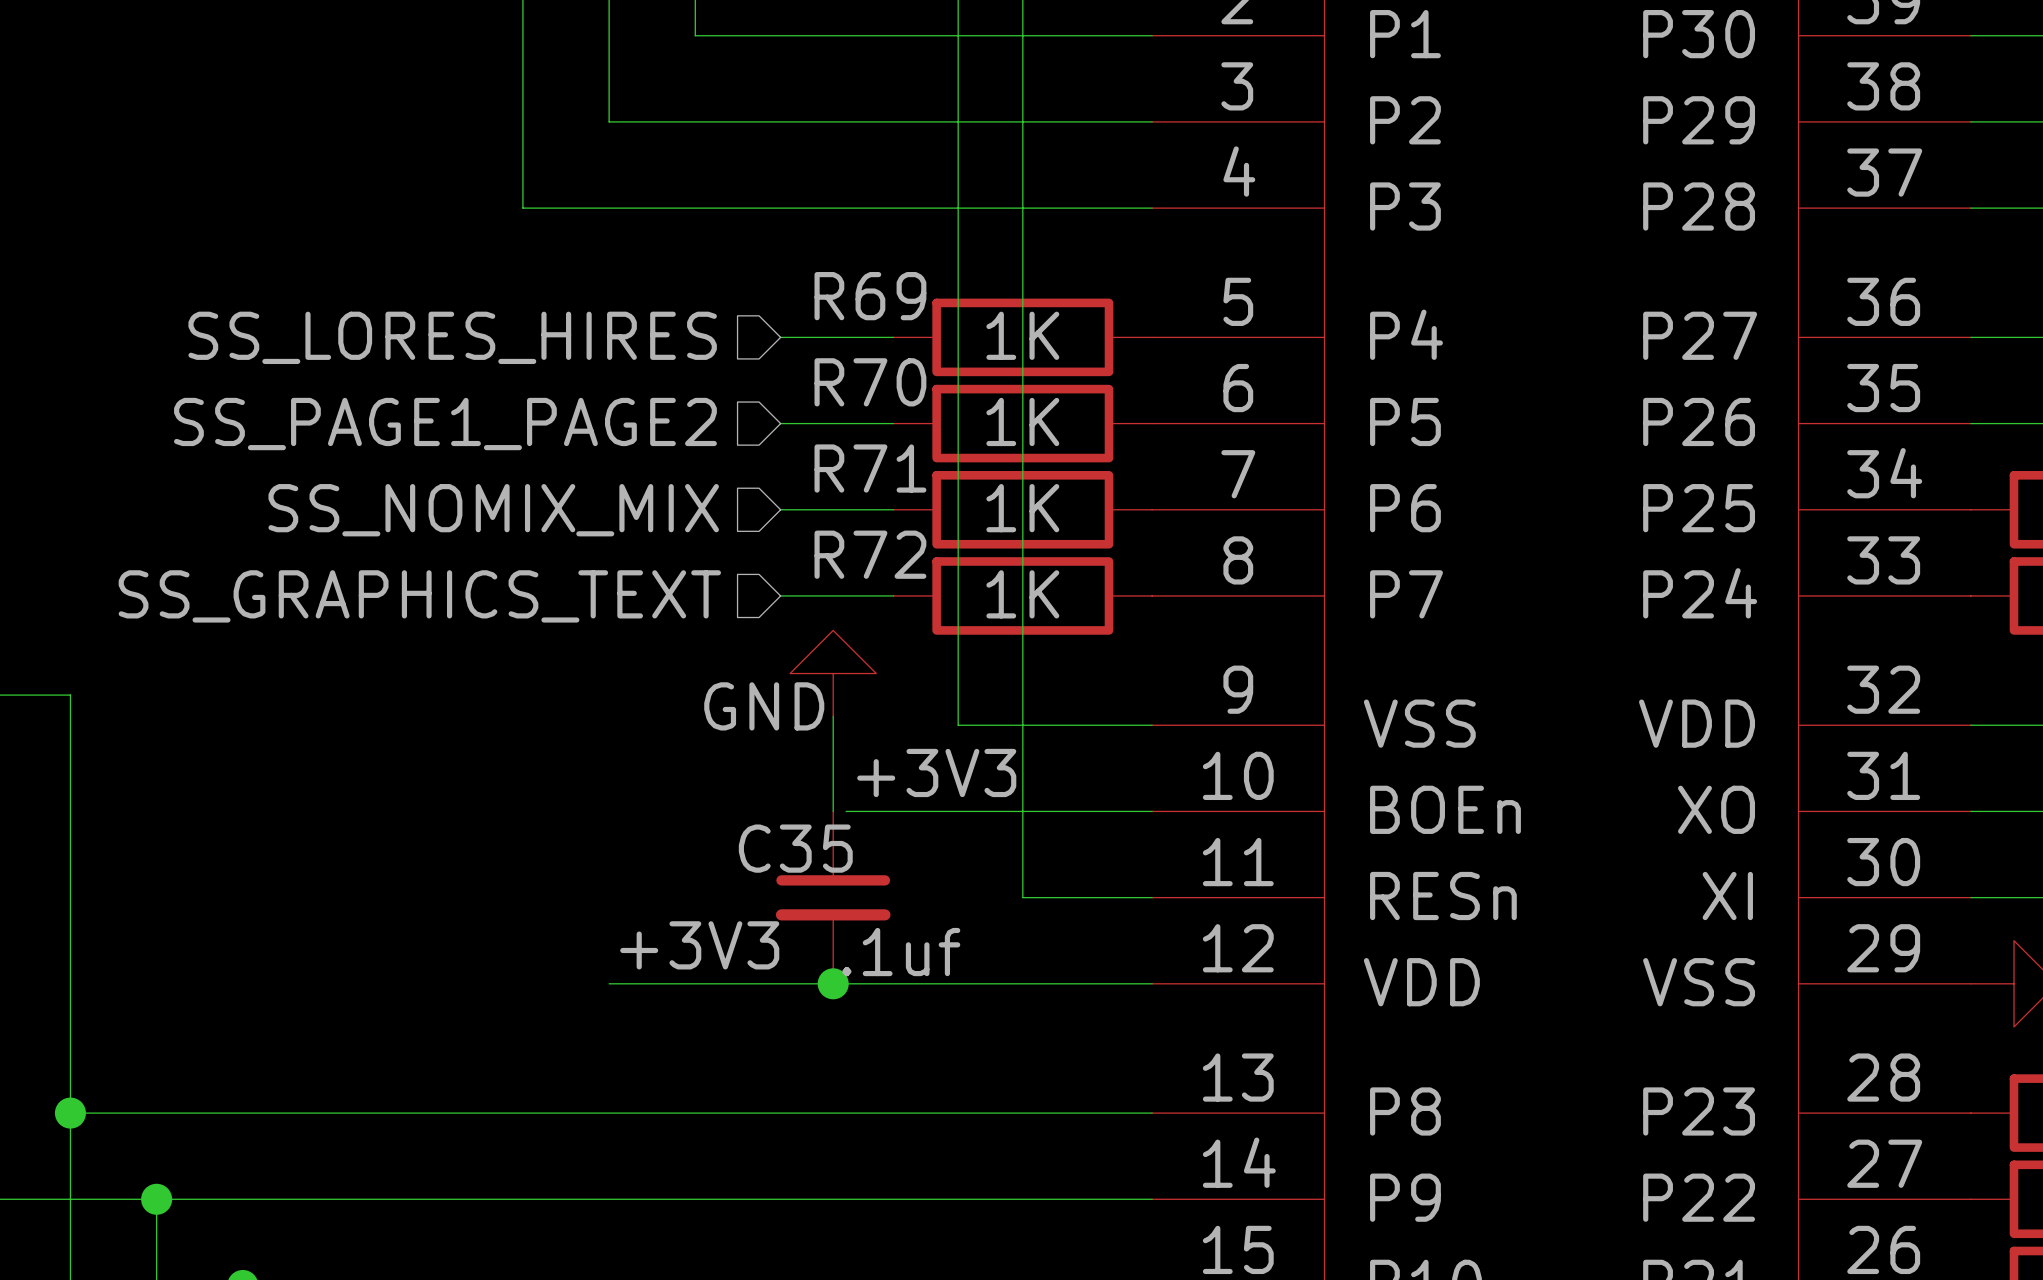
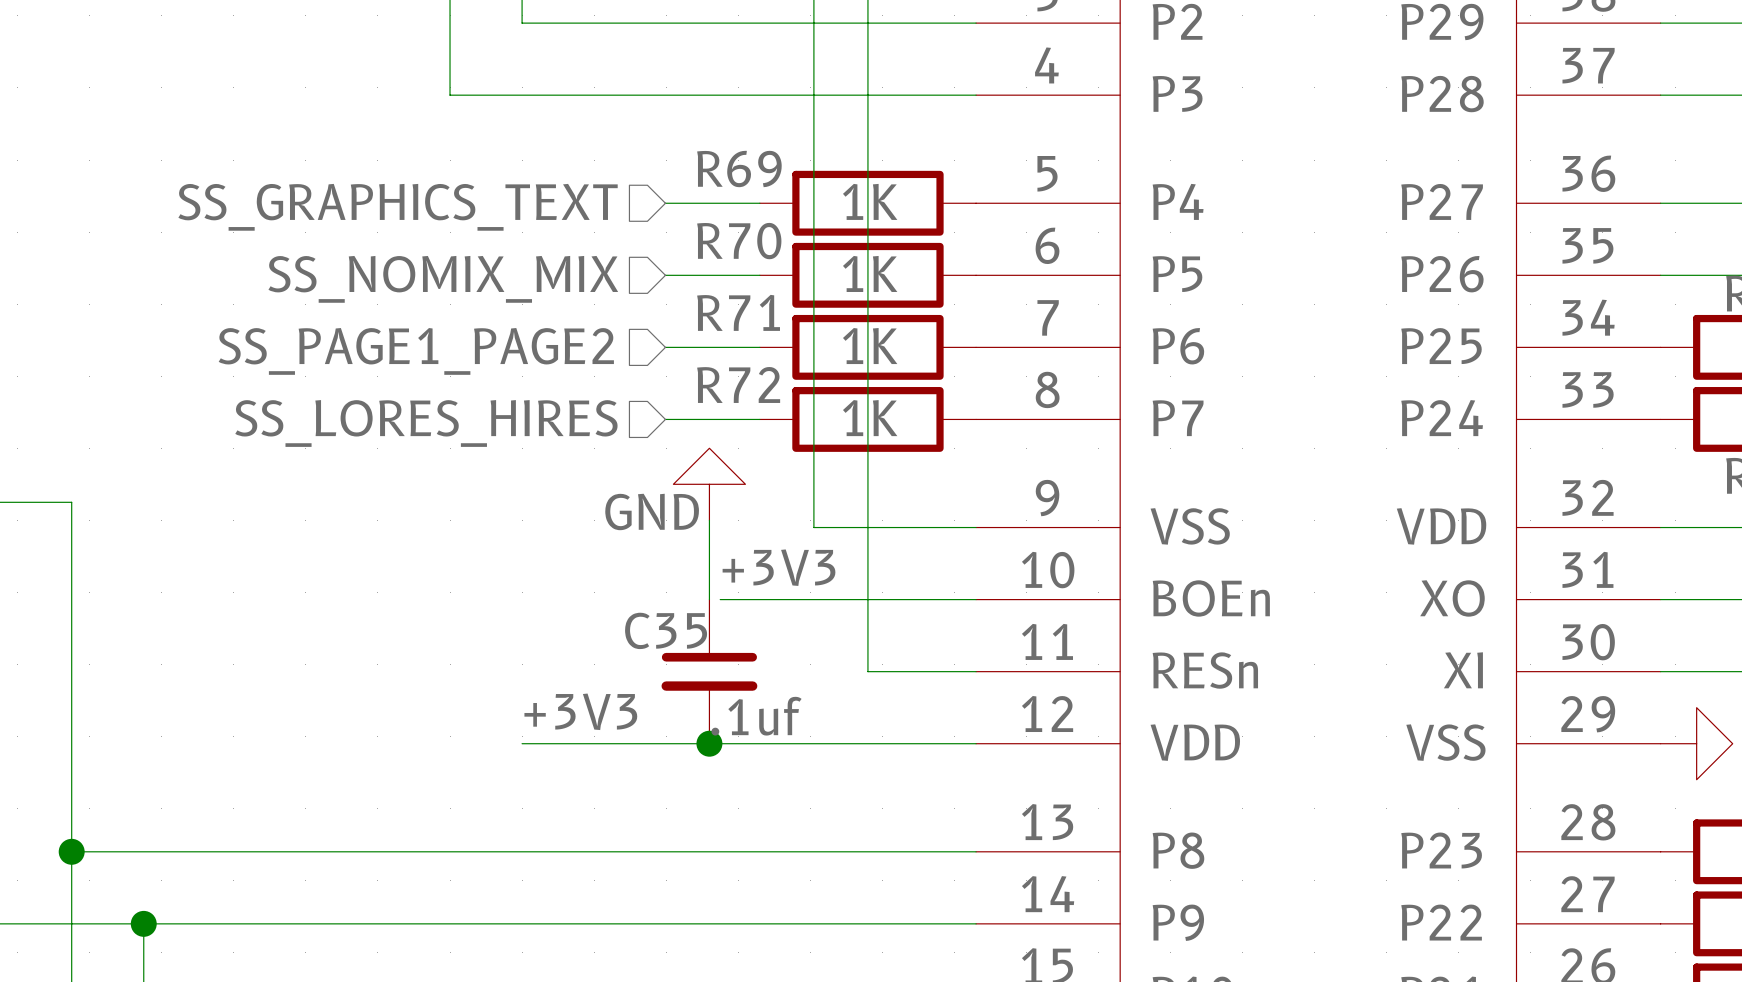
hierarchical label: SS_LORES_HIRES (452, 337) -> SS_GRAPHICS_TEXT (398, 207)
hierarchical label: SS_PAGE1_PAGE2 (445, 424) -> SS_NOMIX_MIX (443, 279)
hierarchical label: SS_NOMIX_MIX (493, 510) -> SS_PAGE1_PAGE2 (416, 351)
hierarchical label: SS_GRAPHICS_TEXT (419, 596) -> SS_LORES_HIRES (426, 423)

